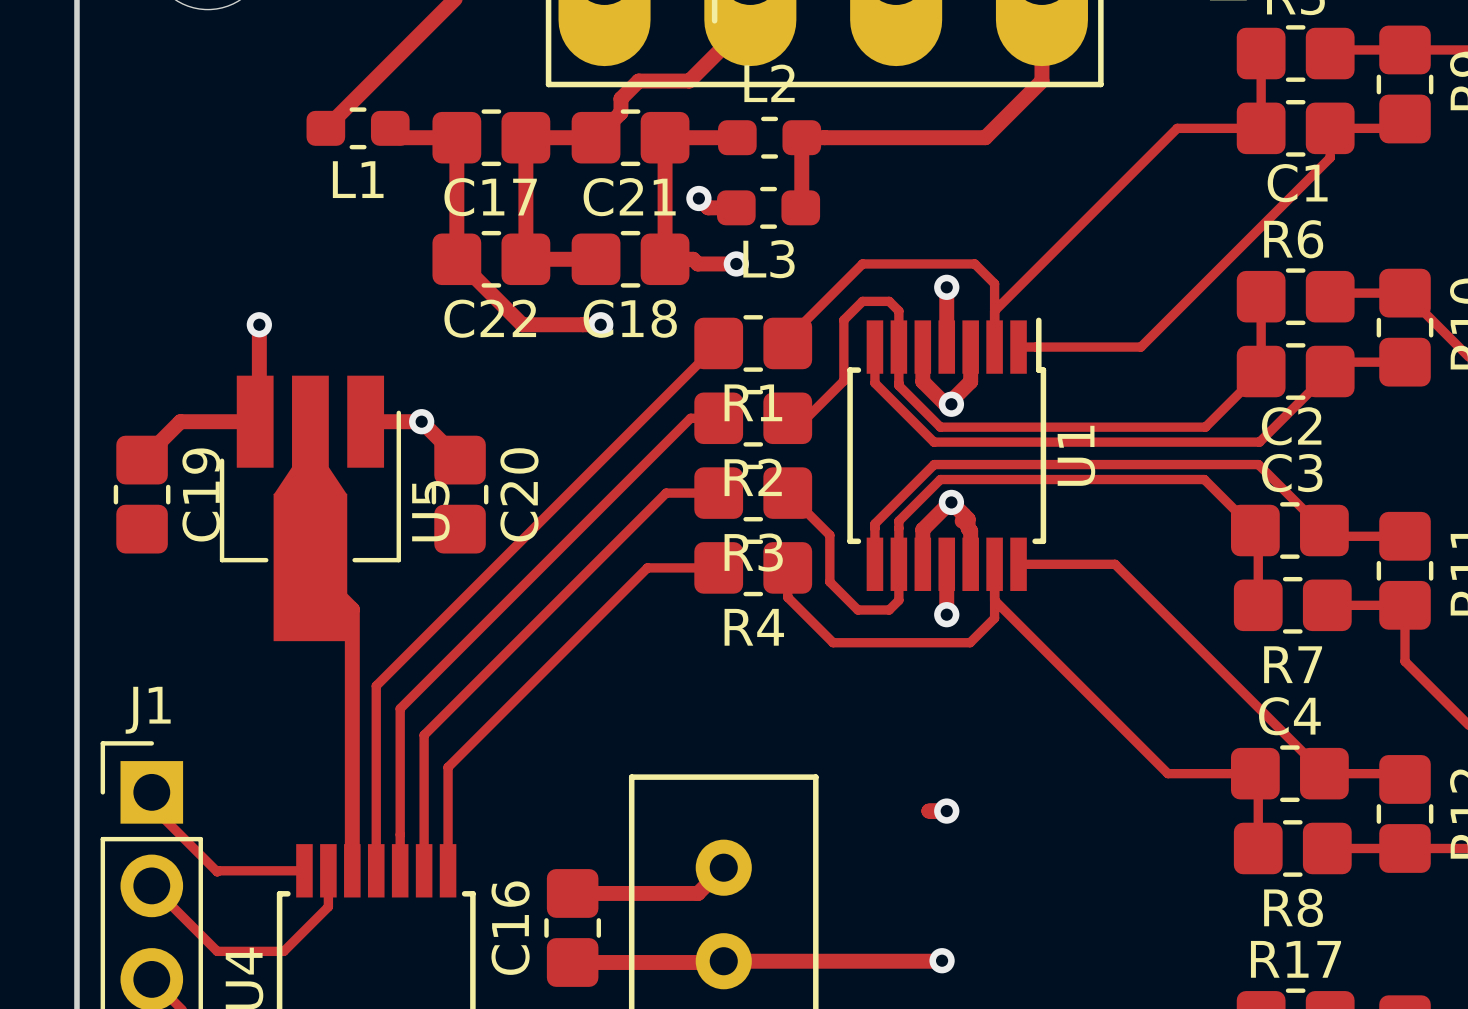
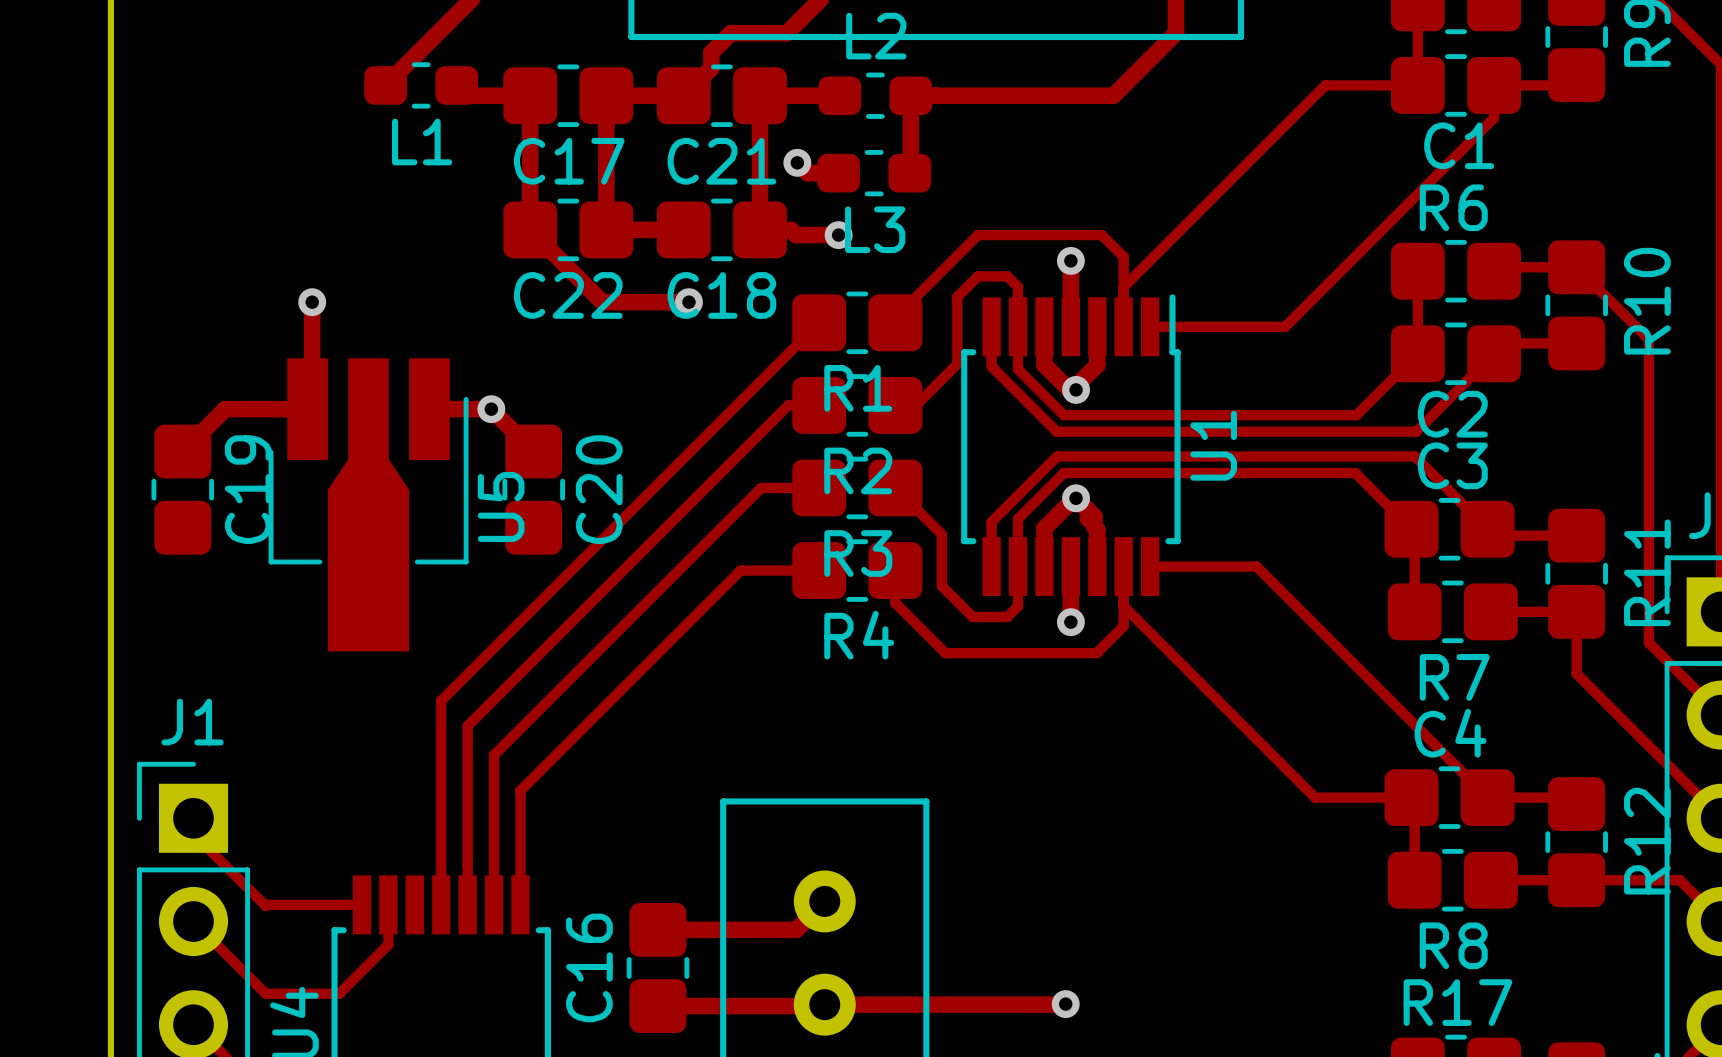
track: (310, 567) (352, 609) (352, 870) -> none
track: (928, 811) (946, 811) -> none
via: (946, 811) -> none

